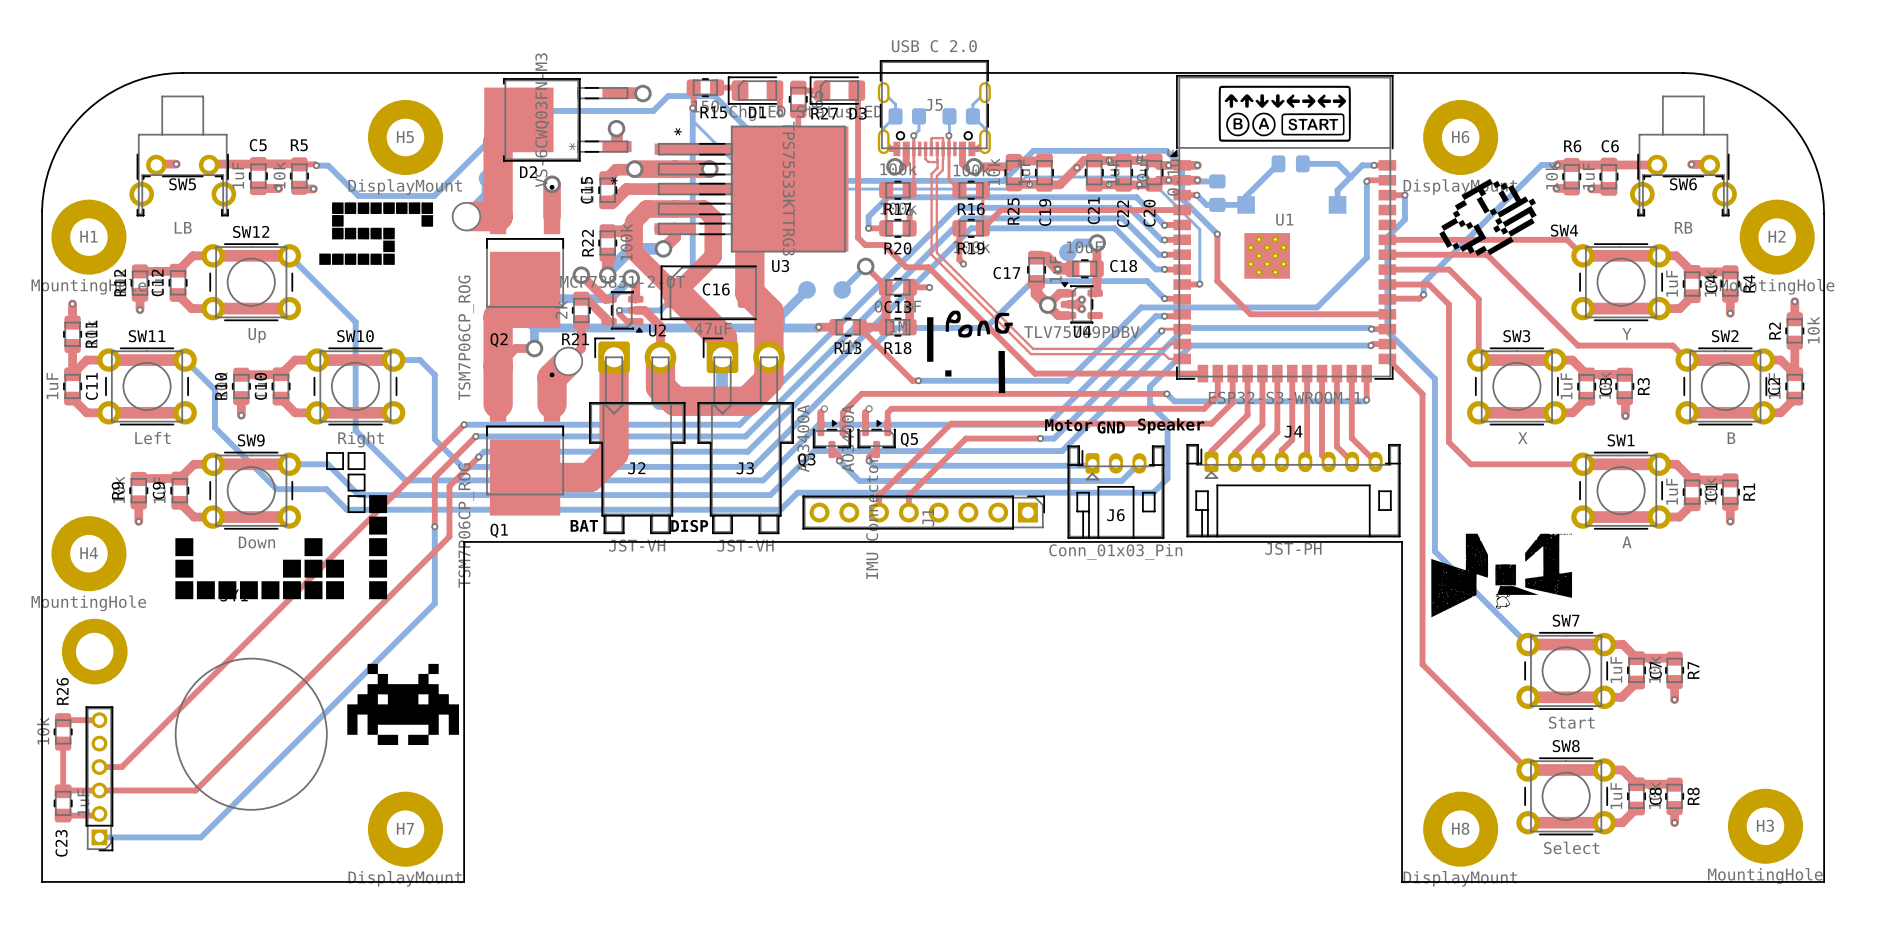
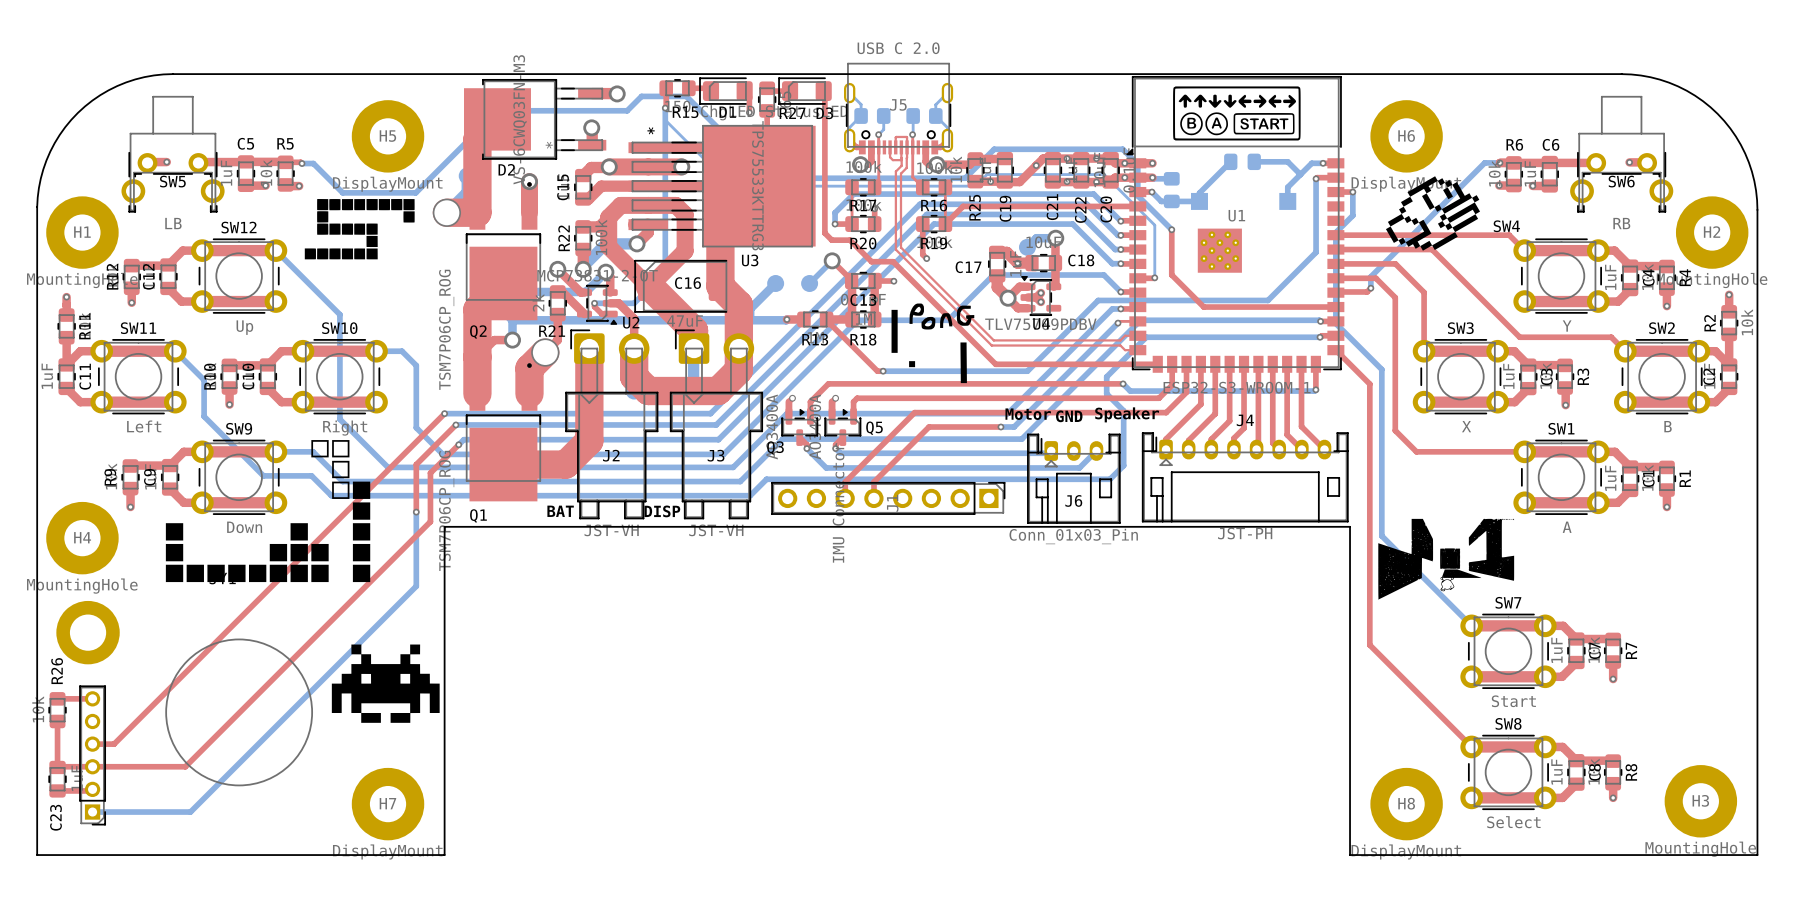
J5 footprint: [877, 60, 991, 157] -> [844, 63, 954, 155]
D2 text: * (614, 180) -> none

